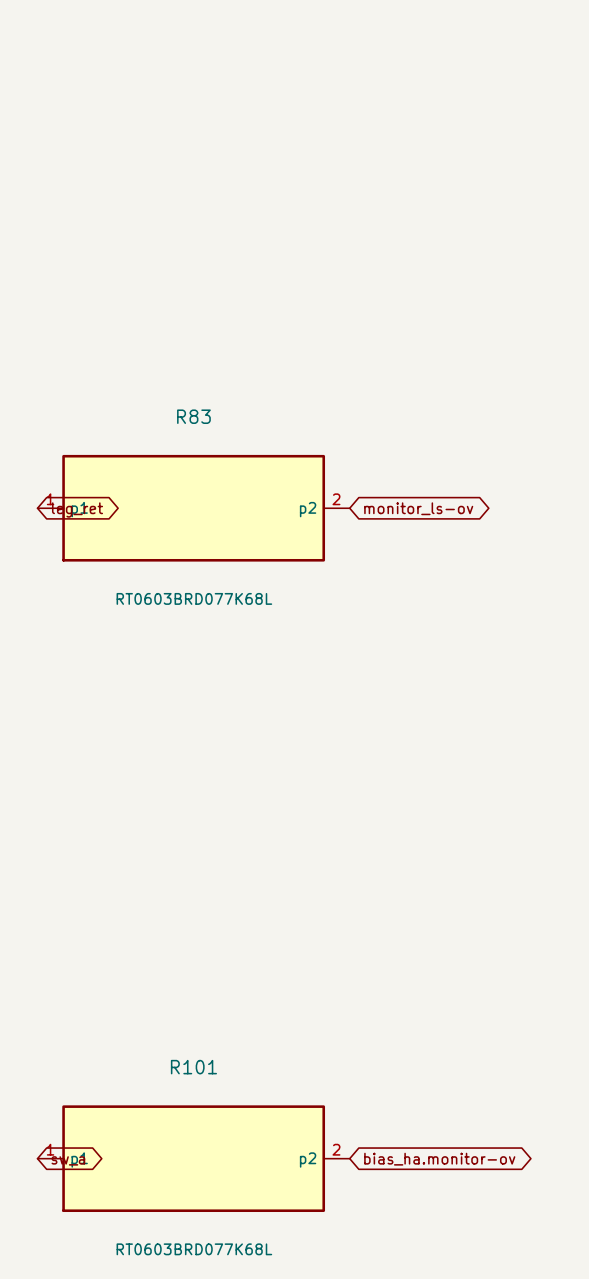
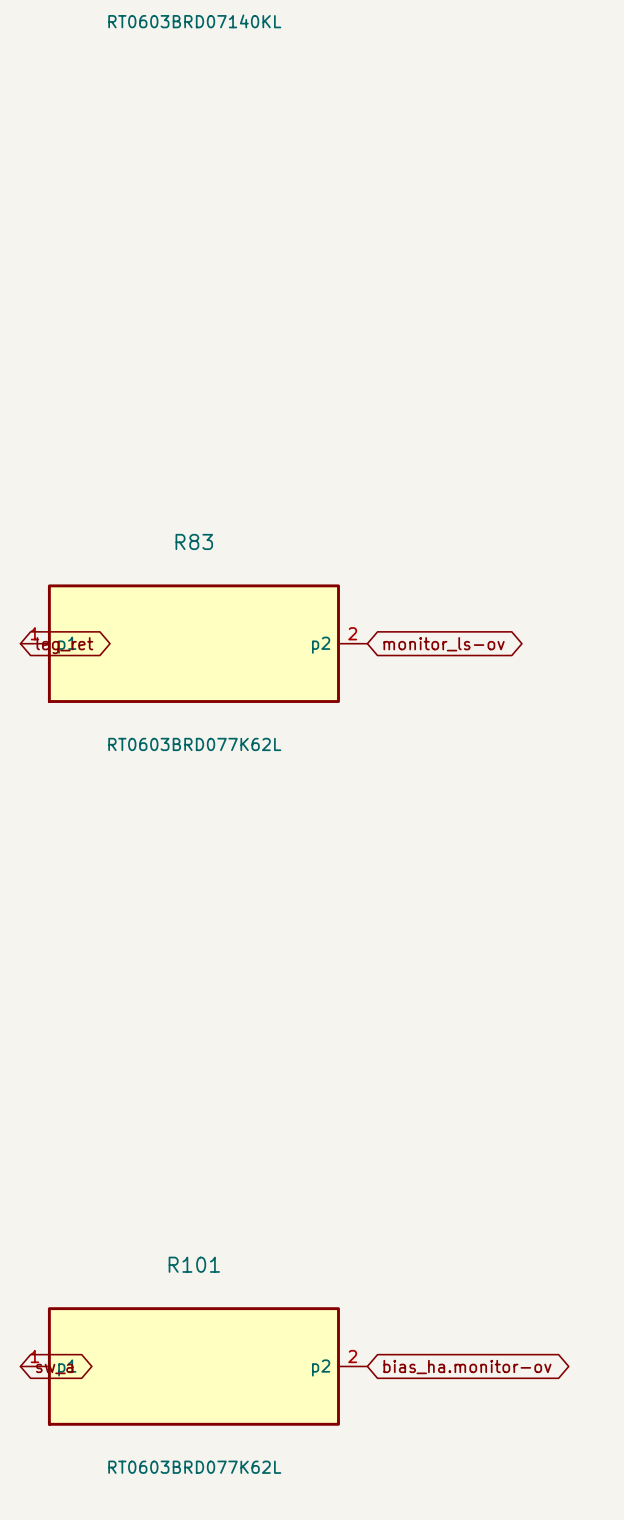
R83 value: RT0603BRD077K68L (194, 598) -> RT0603BRD077K62L (194, 744)
R101 value: RT0603BRD077K68L (194, 1249) -> RT0603BRD077K62L (194, 1467)

